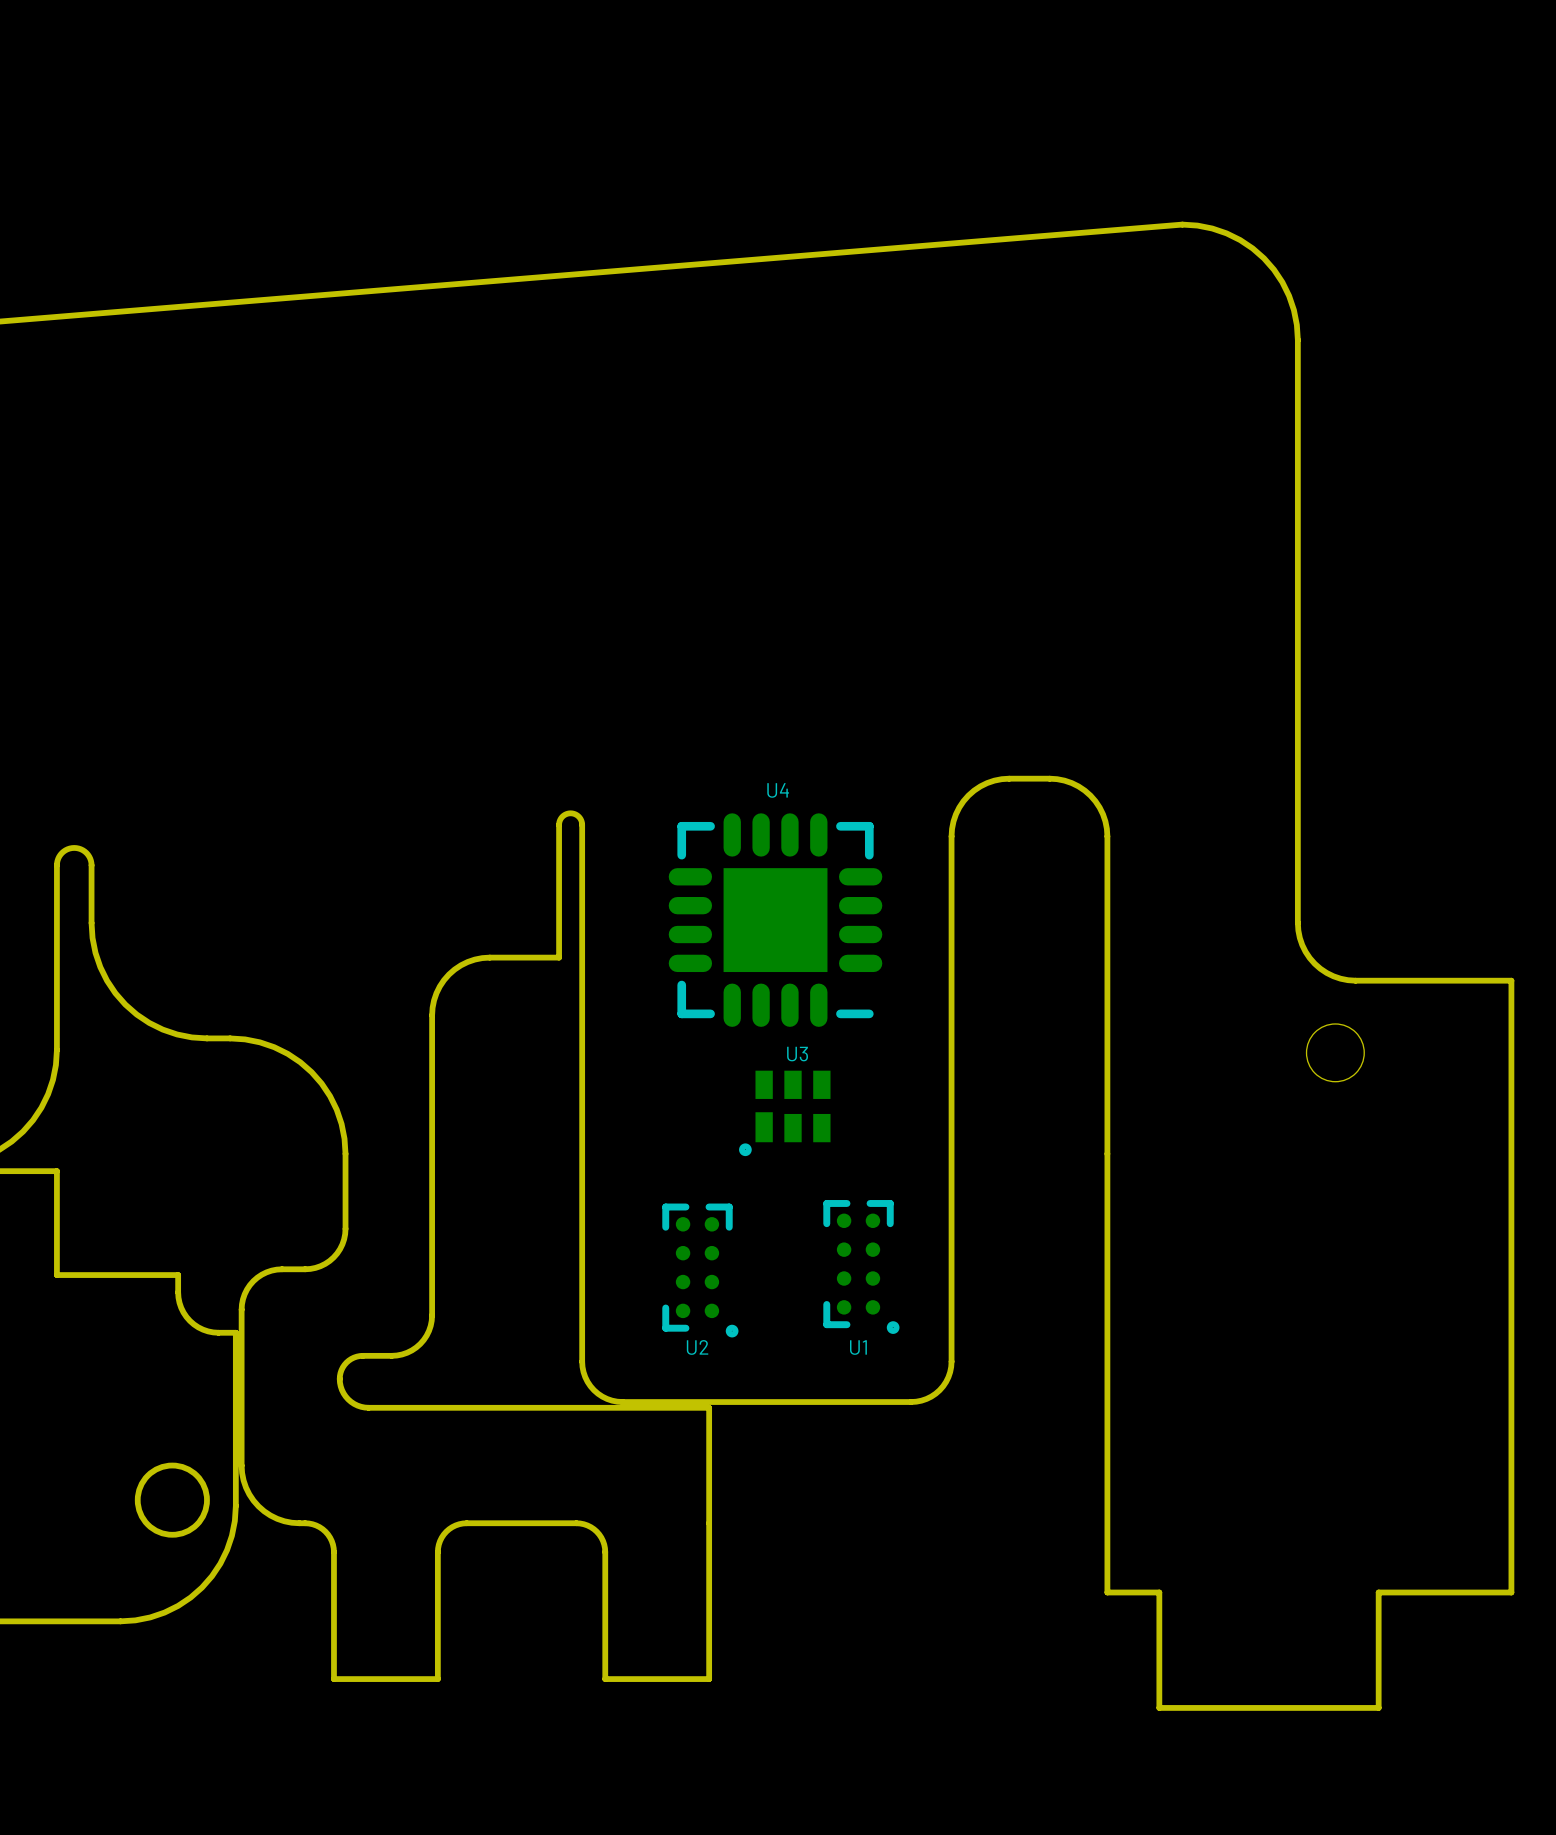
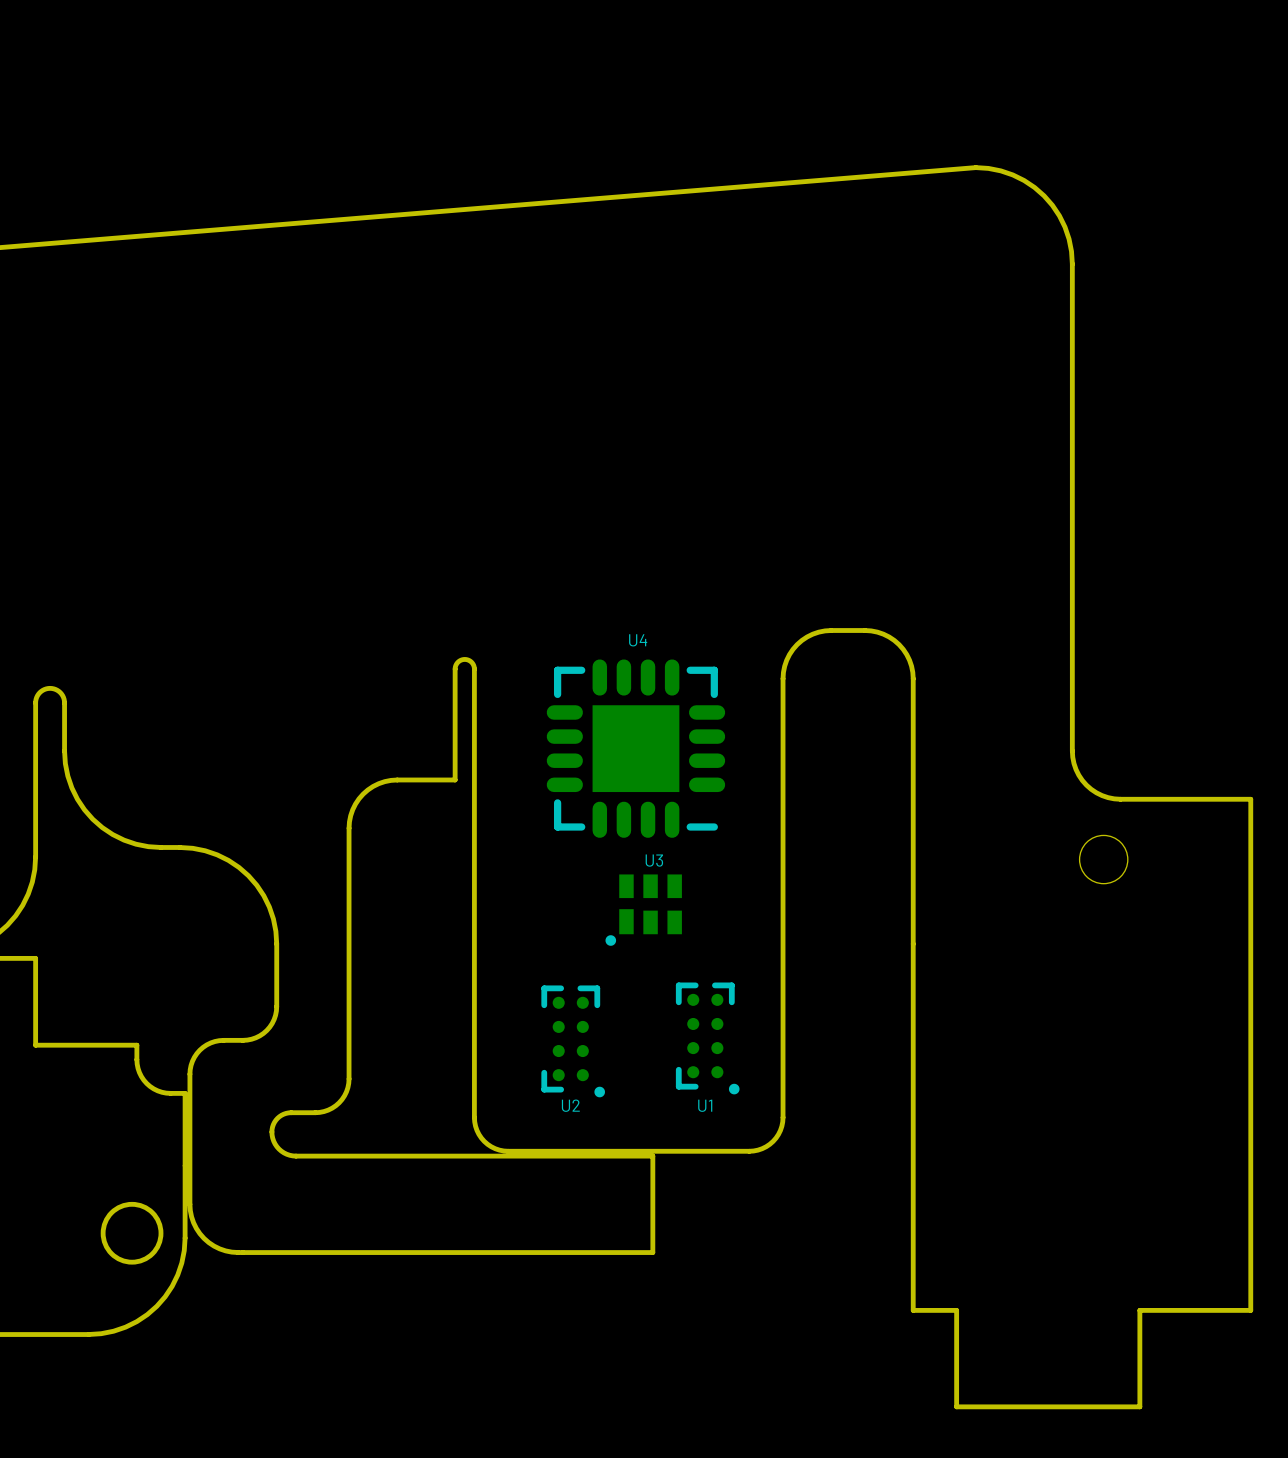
board edge: (709, 1407) (709, 1679) (605, 1679) (605, 1548) (601, 1537) (593, 1529) (576, 1523) -> (580, 1156) (652, 1156) (652, 1252) (469, 1252)
board edge: (466, 1523) (449, 1529) (441, 1537) (438, 1548) (437, 1679) (333, 1679) (333, 1548) (330, 1537) (322, 1529) (305, 1523) -> (377, 1252) (242, 1252)

